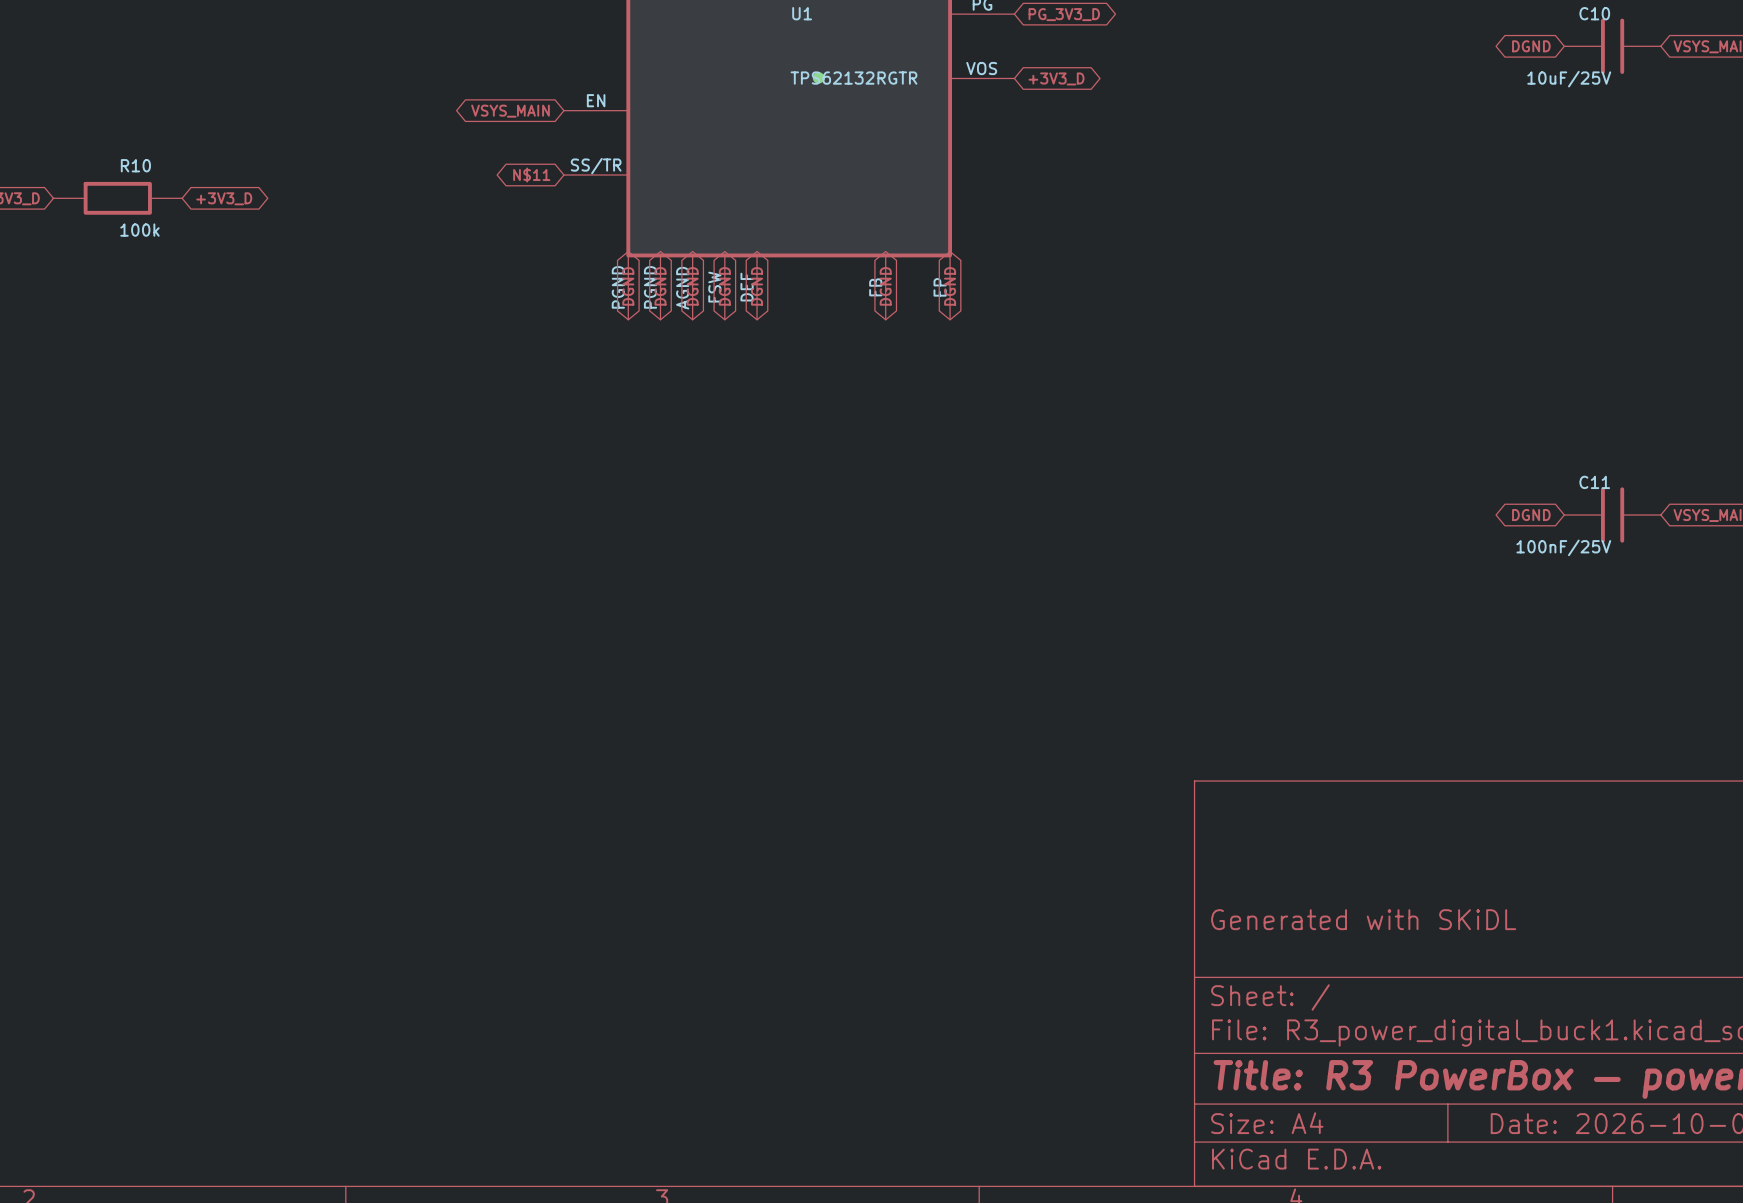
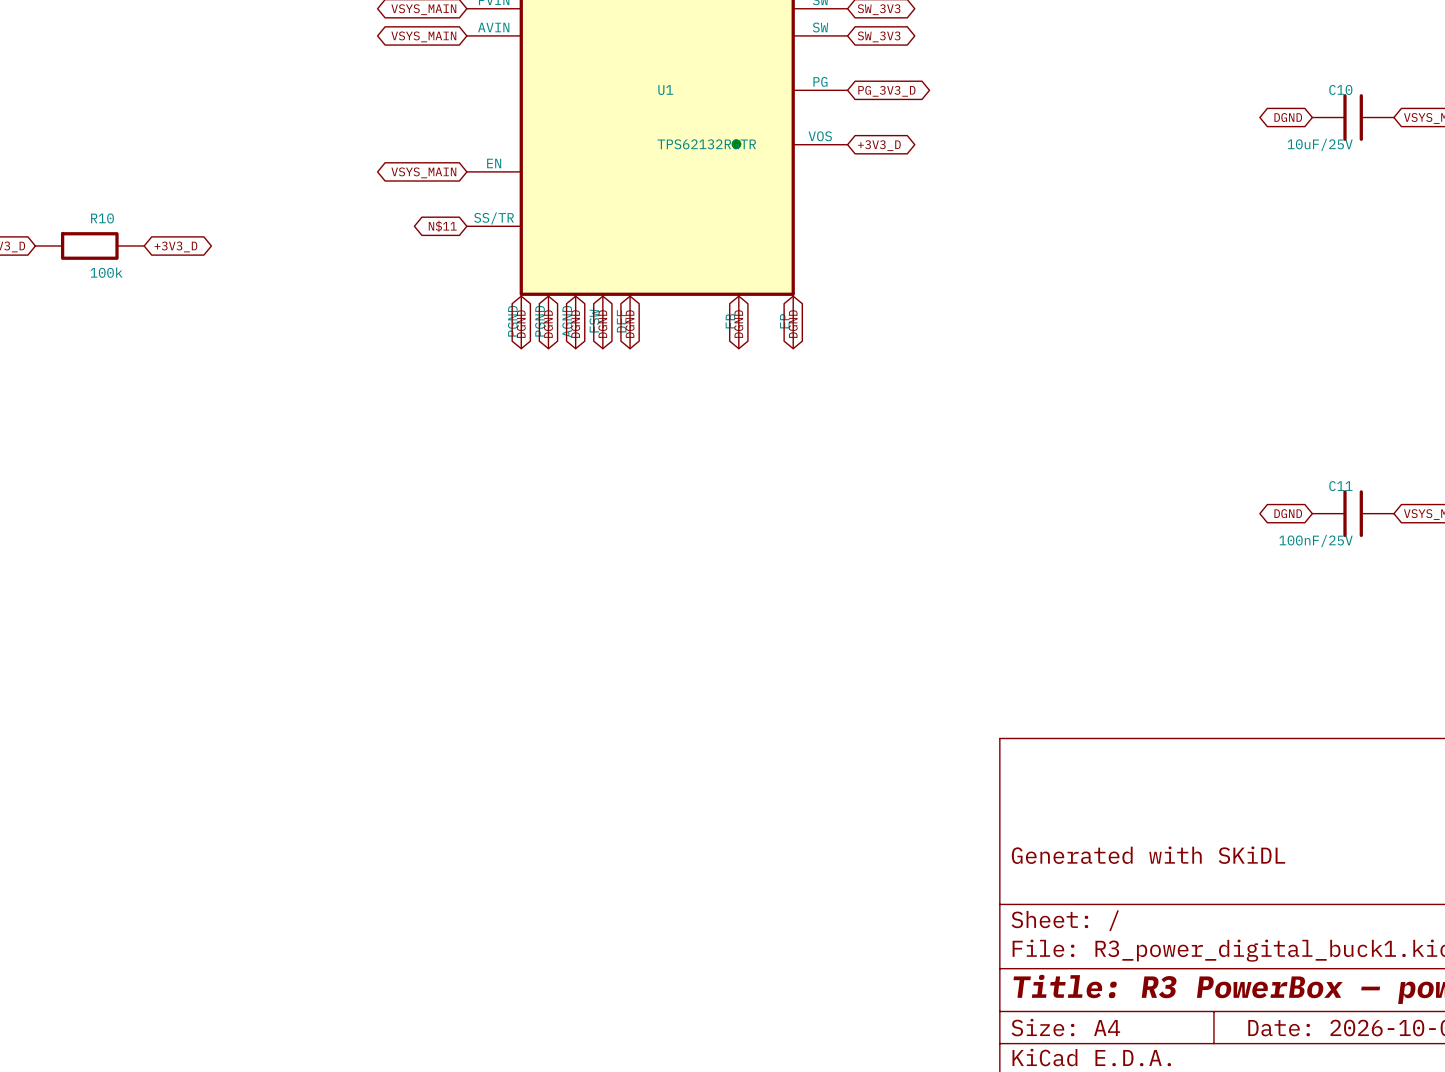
junction position: (818, 77) -> (736, 144)

